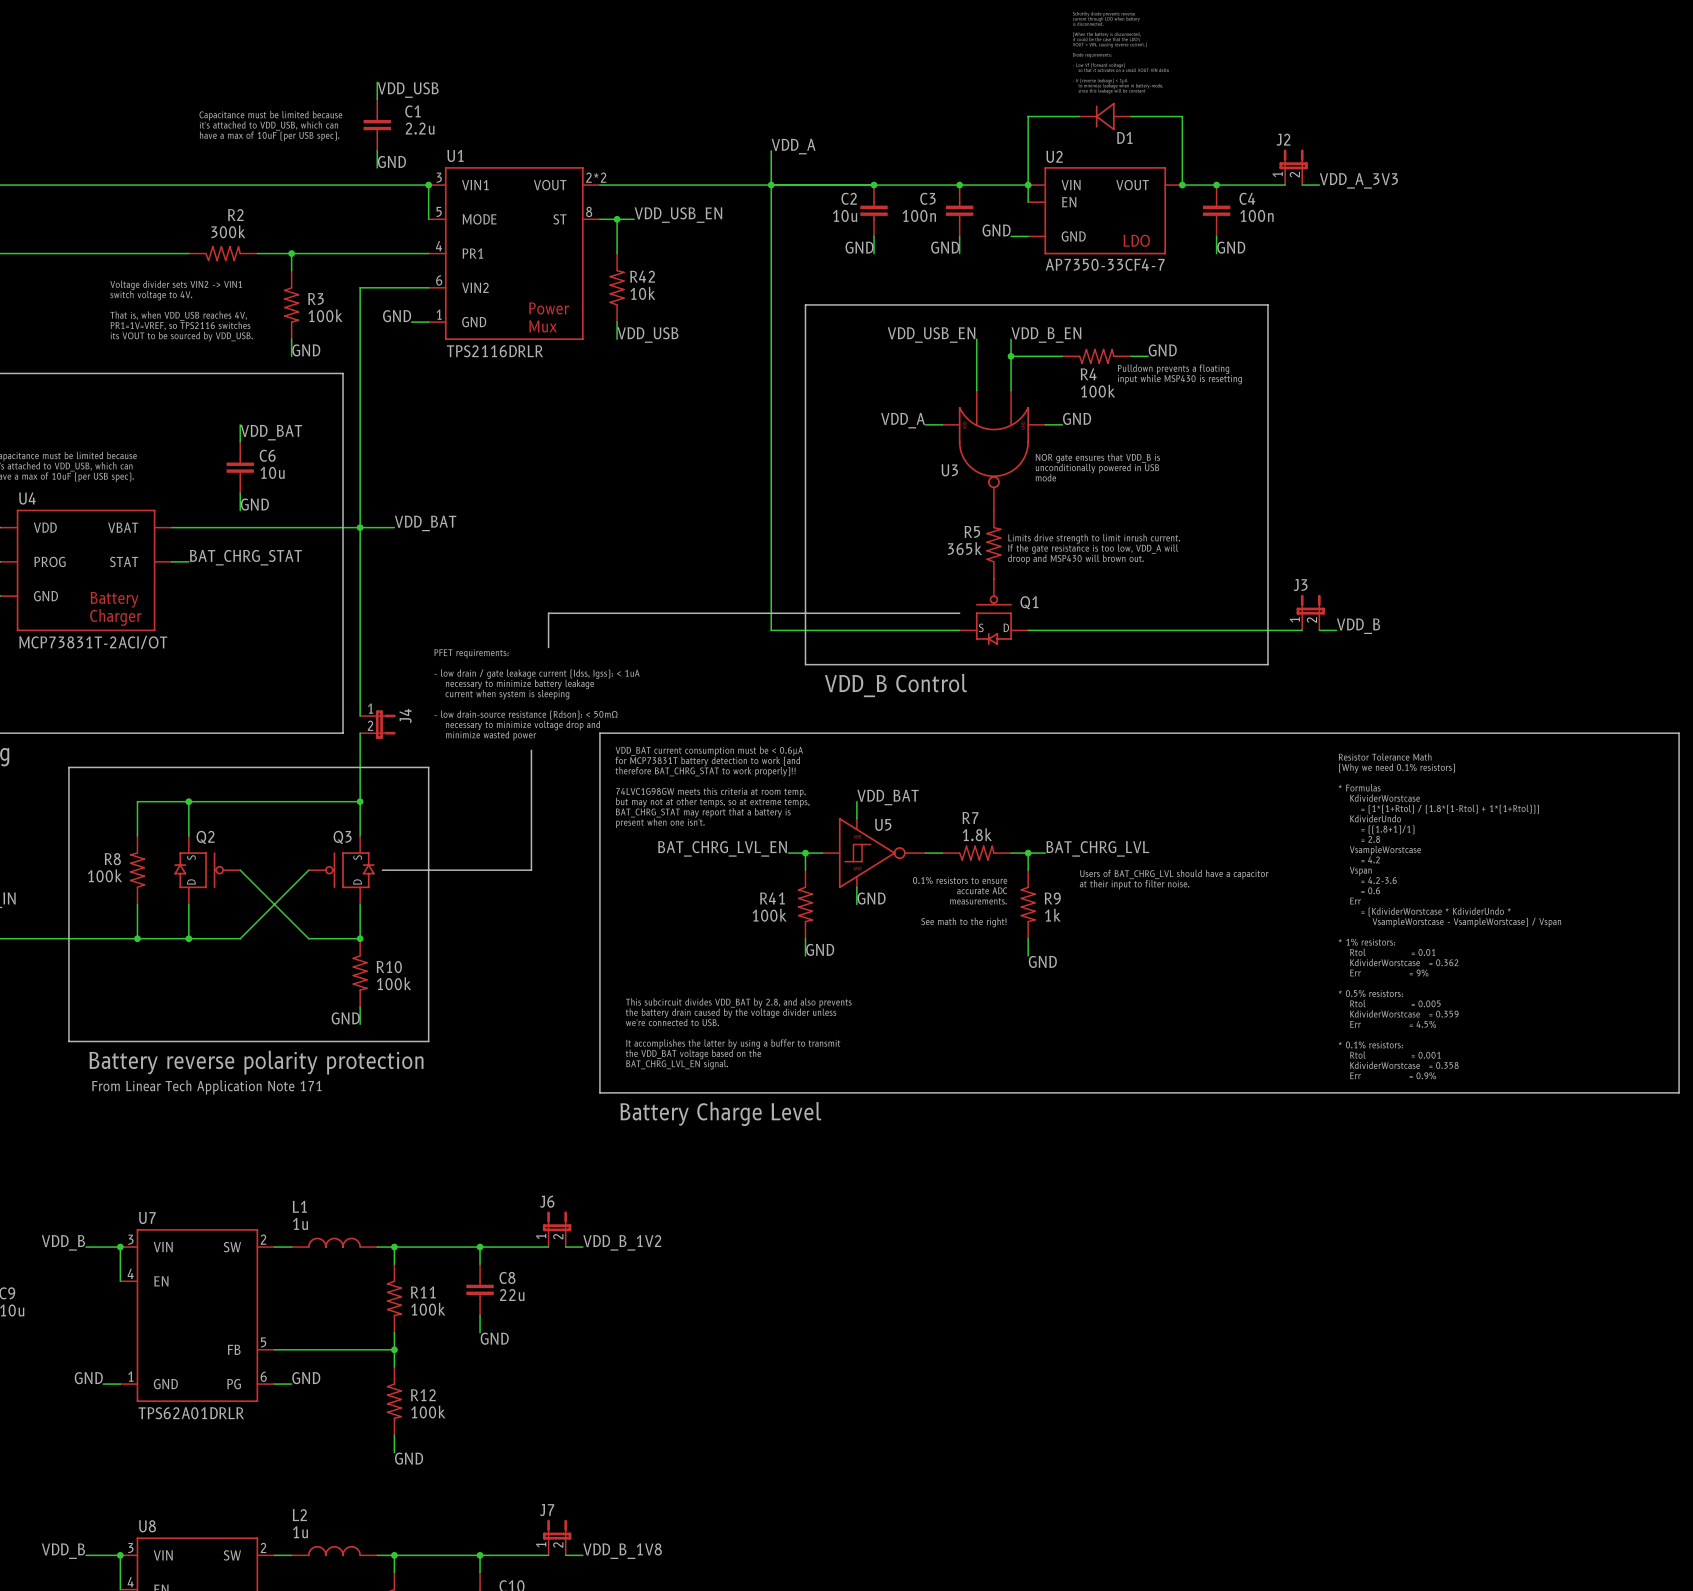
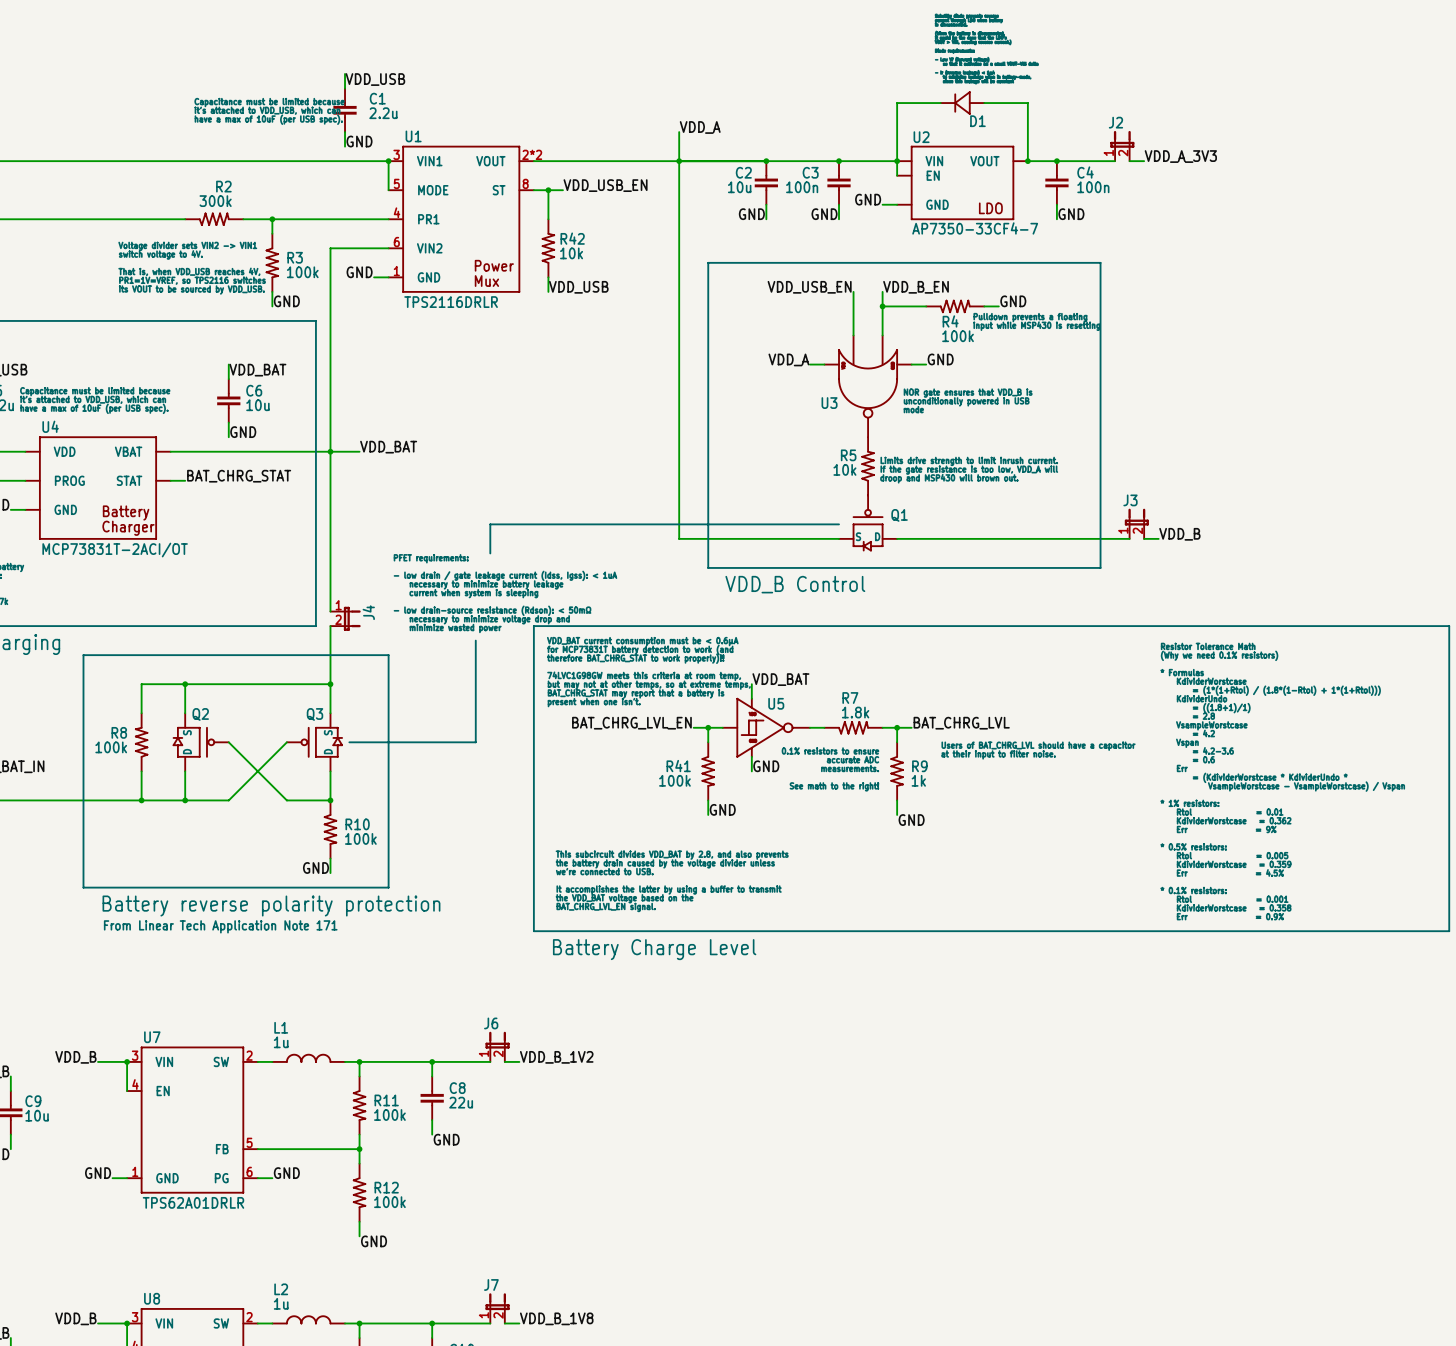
R5 value: 365k (964, 548) -> 10k (844, 469)

